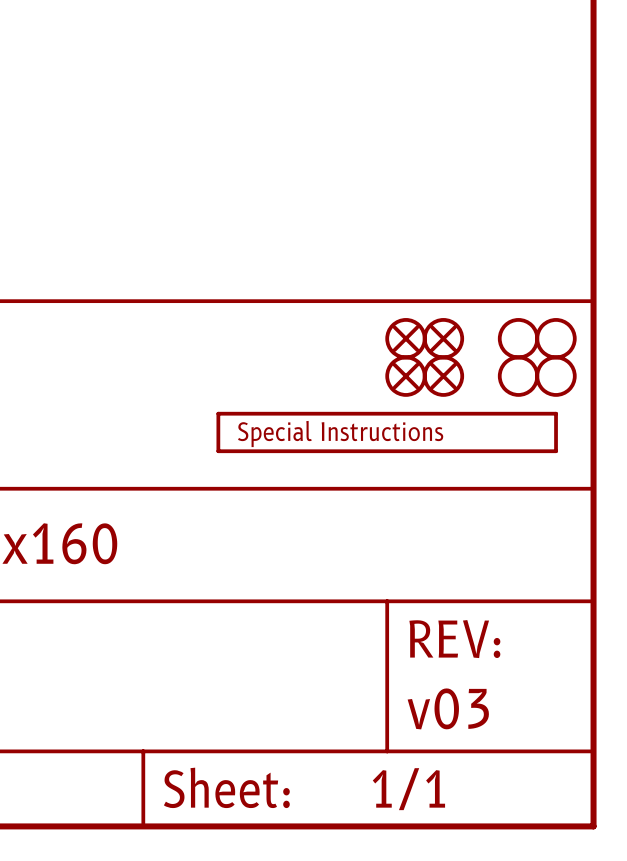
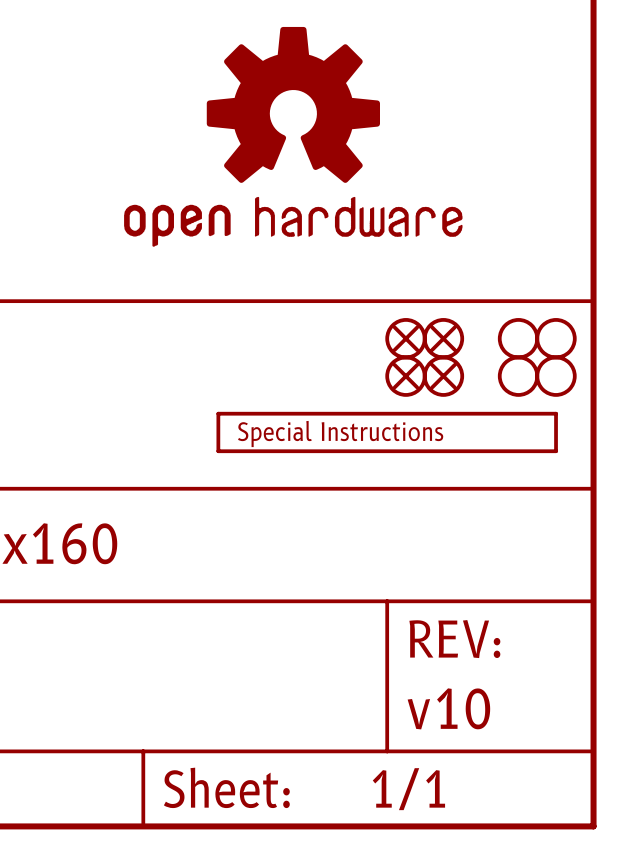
part: none -> (293, 136)
part text: v03 (448, 708) -> v10 (448, 708)

